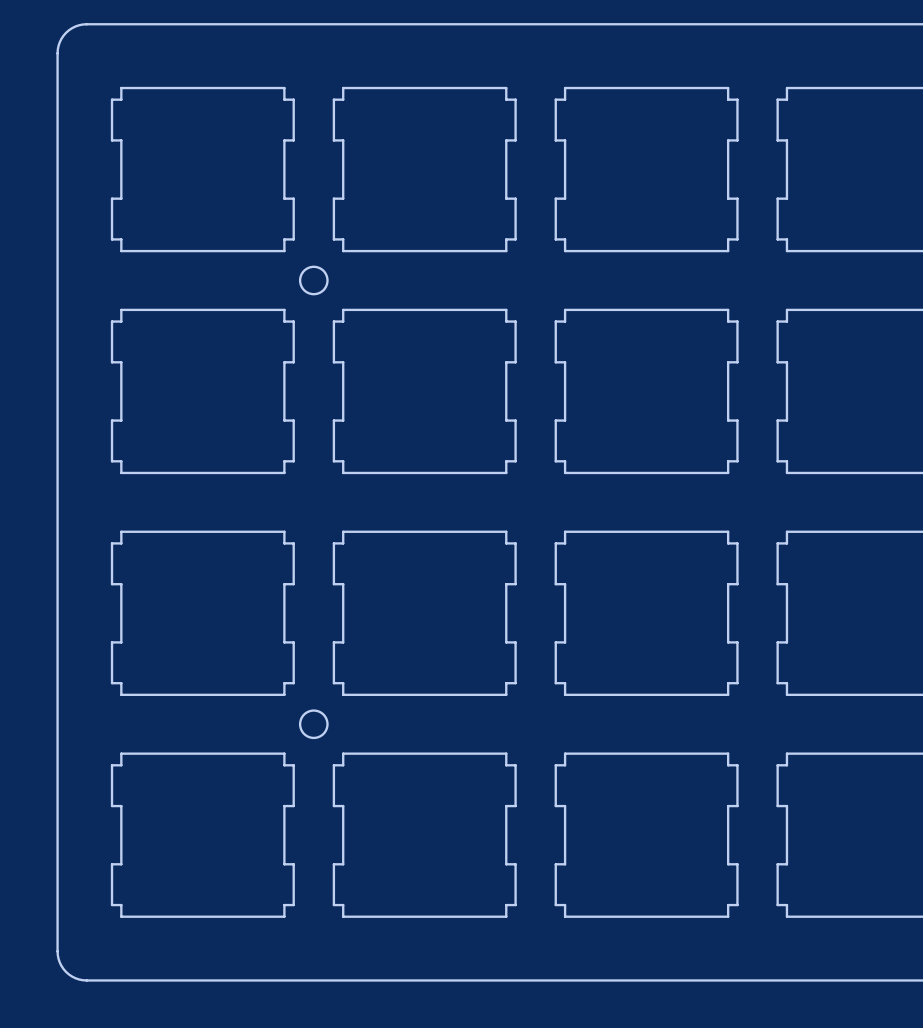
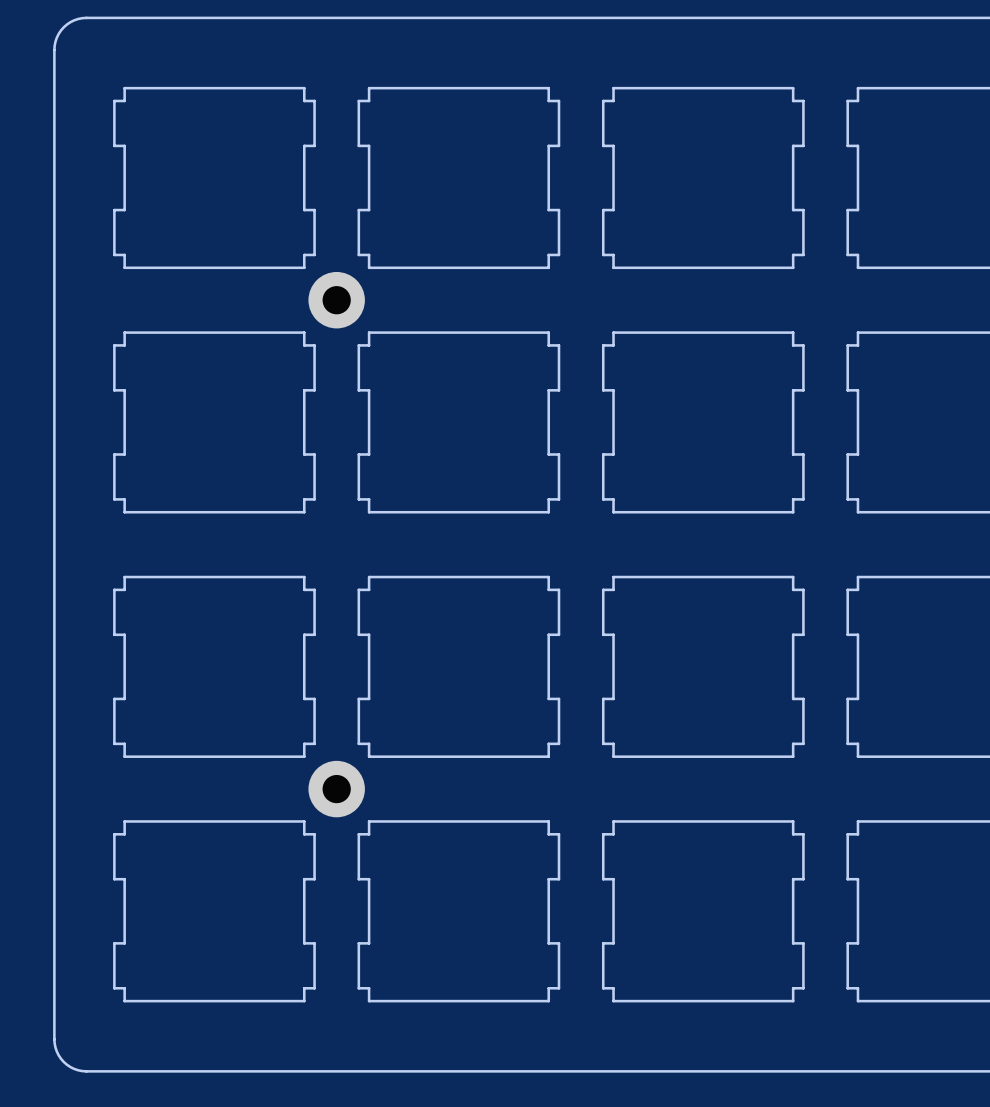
round board edge: [298, 265, 329, 296] -> none
part: none -> (336, 300)
round board edge: [298, 709, 329, 740] -> none
part: none -> (336, 789)

